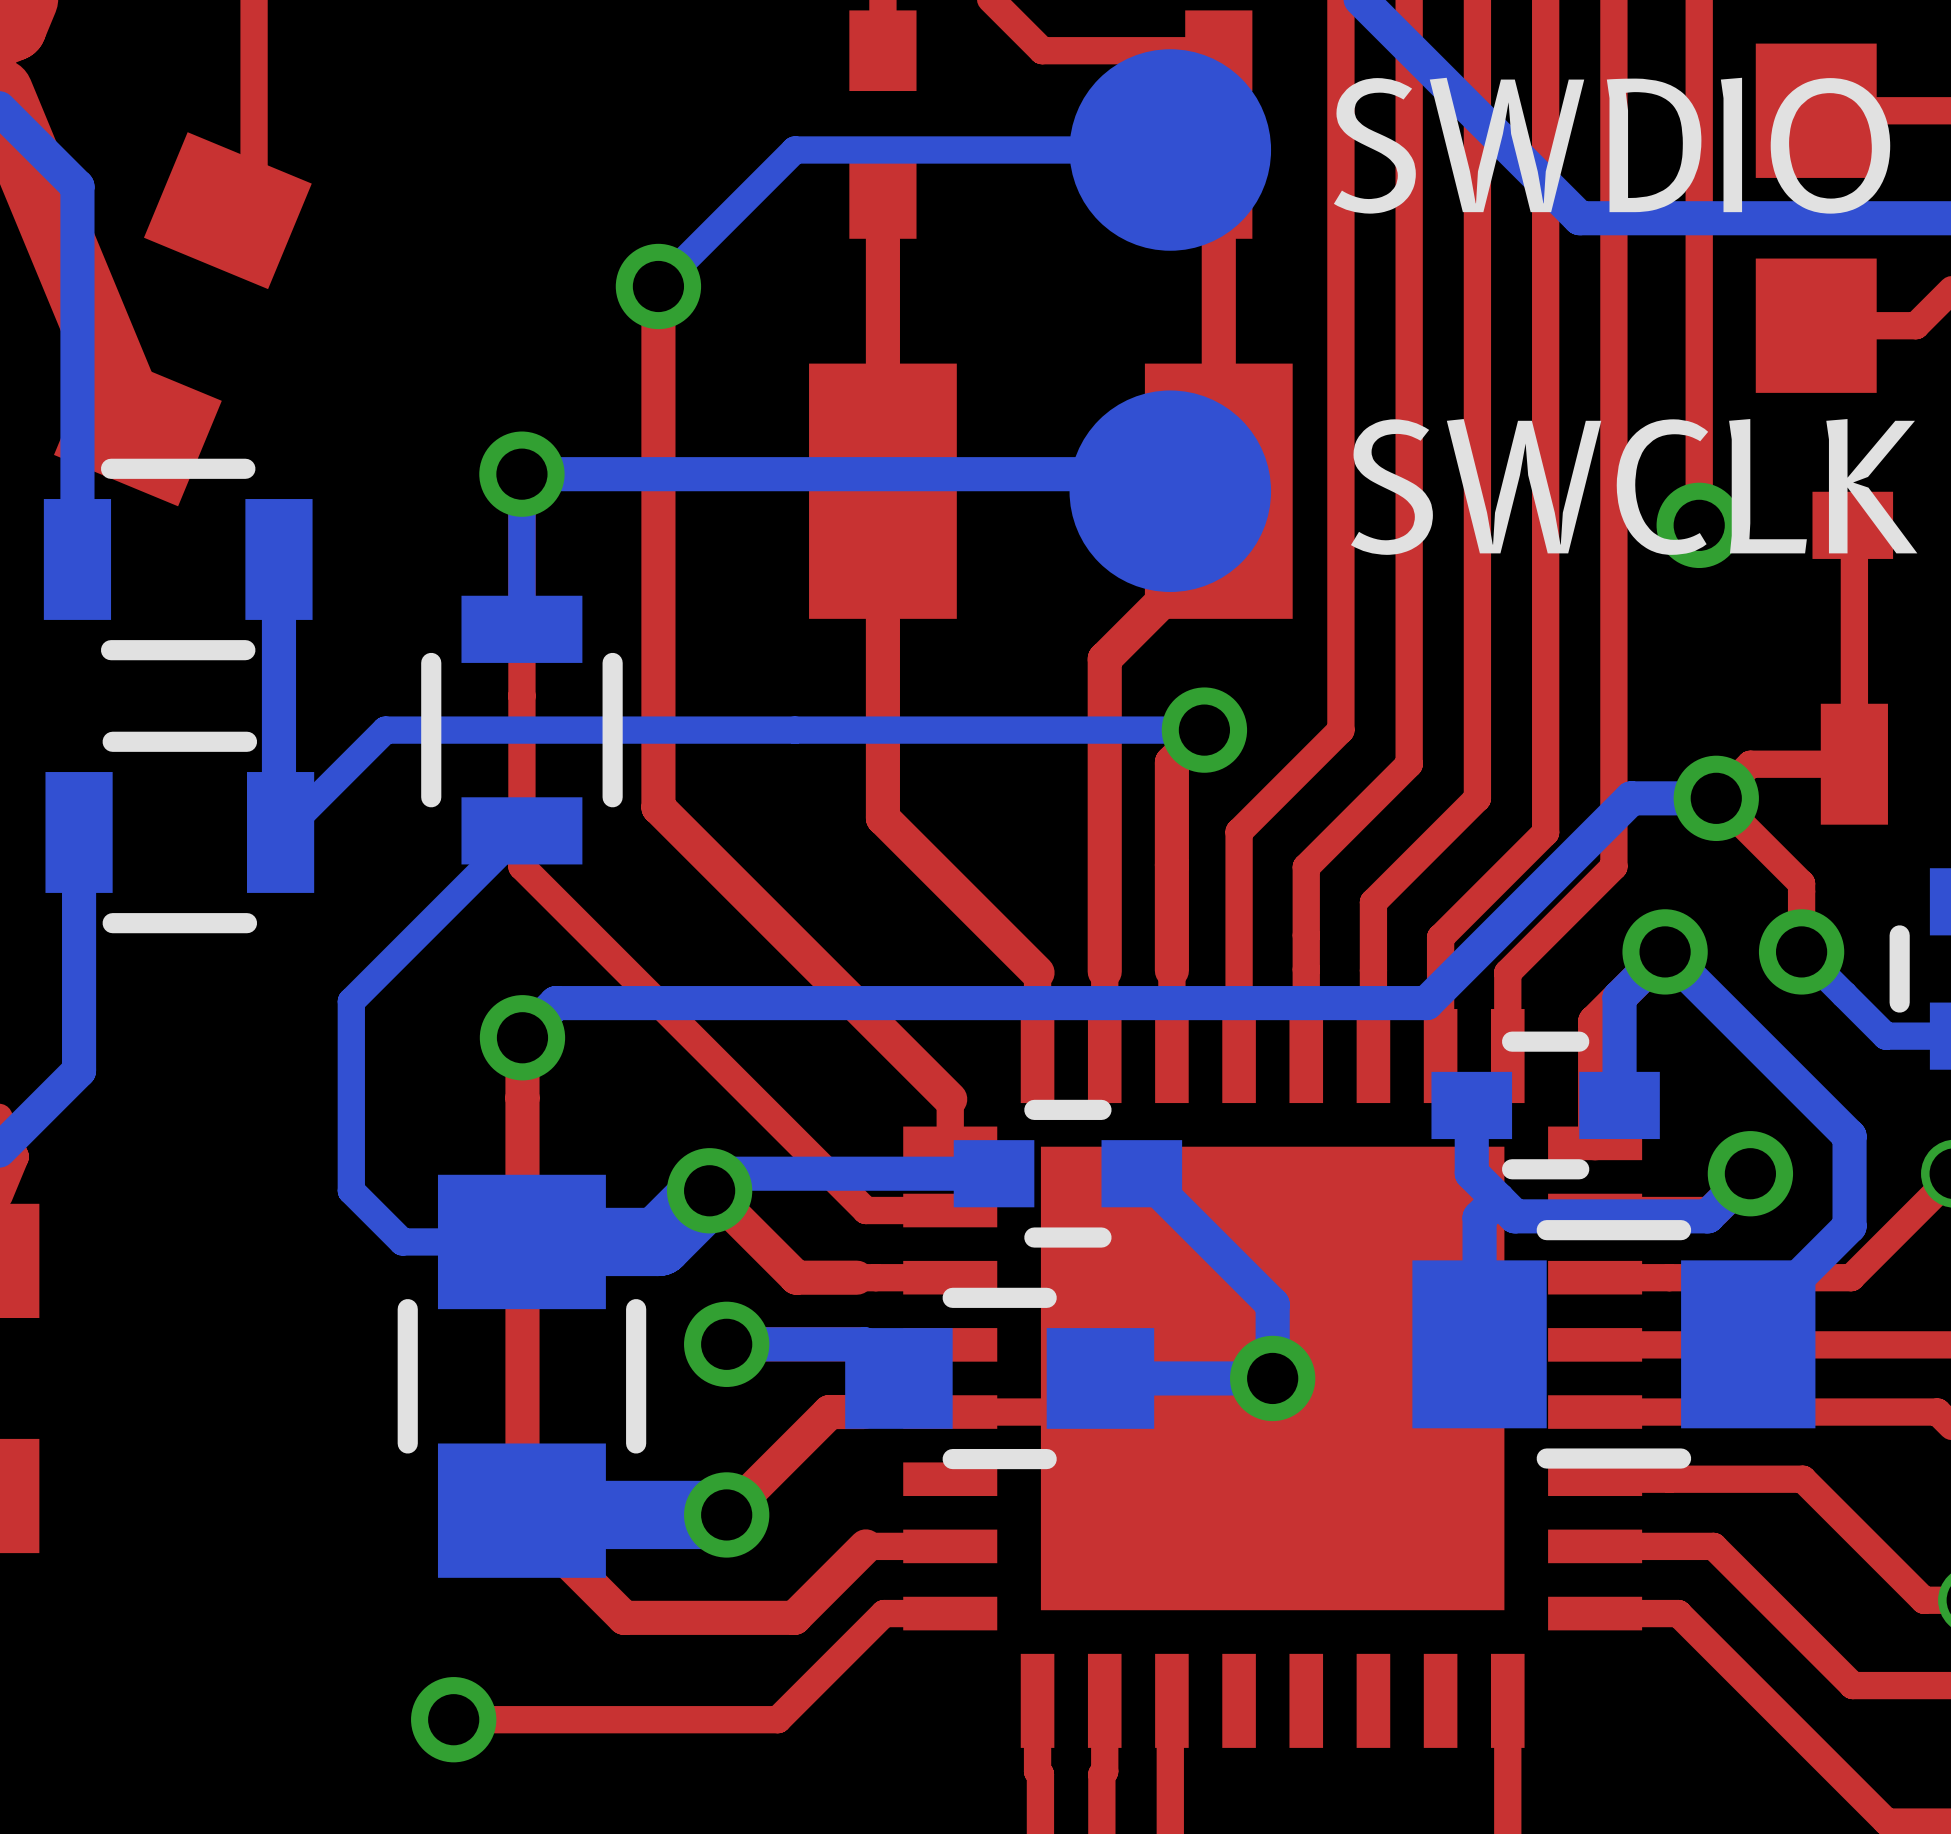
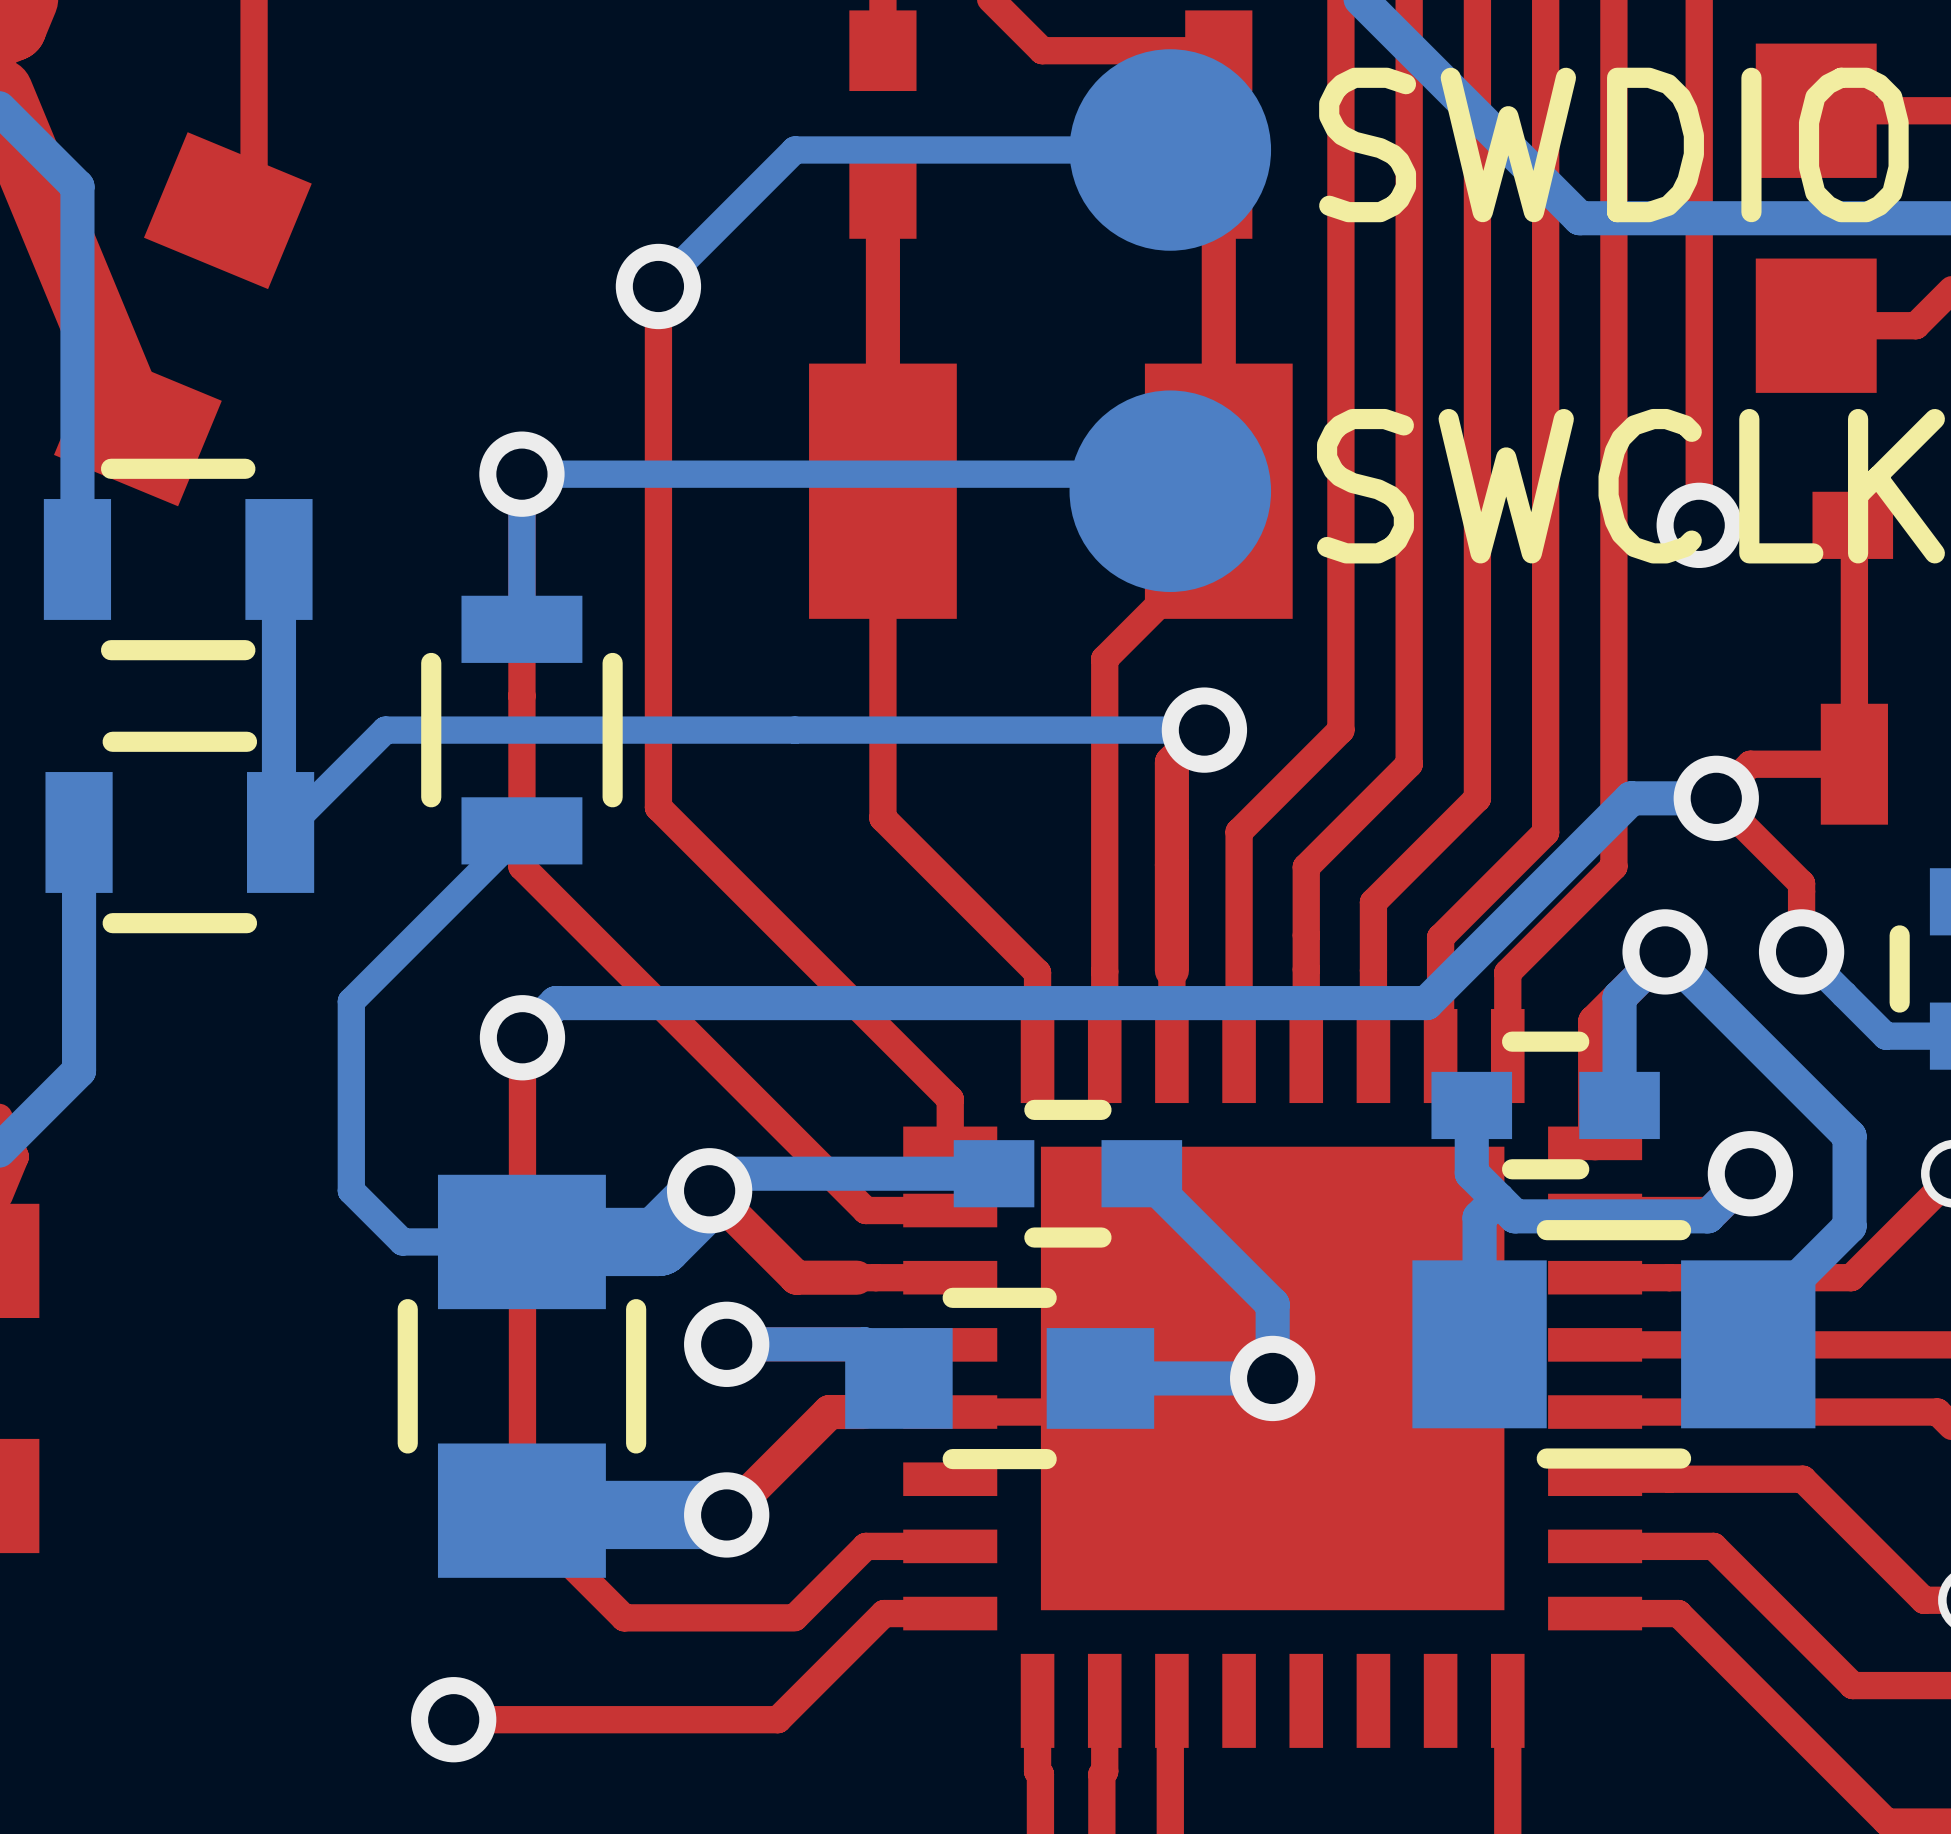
top track width: thick (658, 286) (658, 807) (950, 1099) -> thin (658, 286) (658, 807) (950, 1099)
bottom track width: thick (1153, 474) (521, 474) -> thin (1153, 474) (521, 474)
top track width: thick (882, 491) (882, 818) (1037, 972) -> thin (882, 491) (882, 818) (1037, 972)
top track width: thick (1218, 544) (1104, 659) (1104, 971) -> thin (1218, 544) (1104, 659) (1104, 971)
top track width: thick (522, 1037) (522, 1516) (624, 1617) (794, 1617) (865, 1546) -> thin (522, 1037) (522, 1516) (624, 1617) (794, 1617) (865, 1546)

